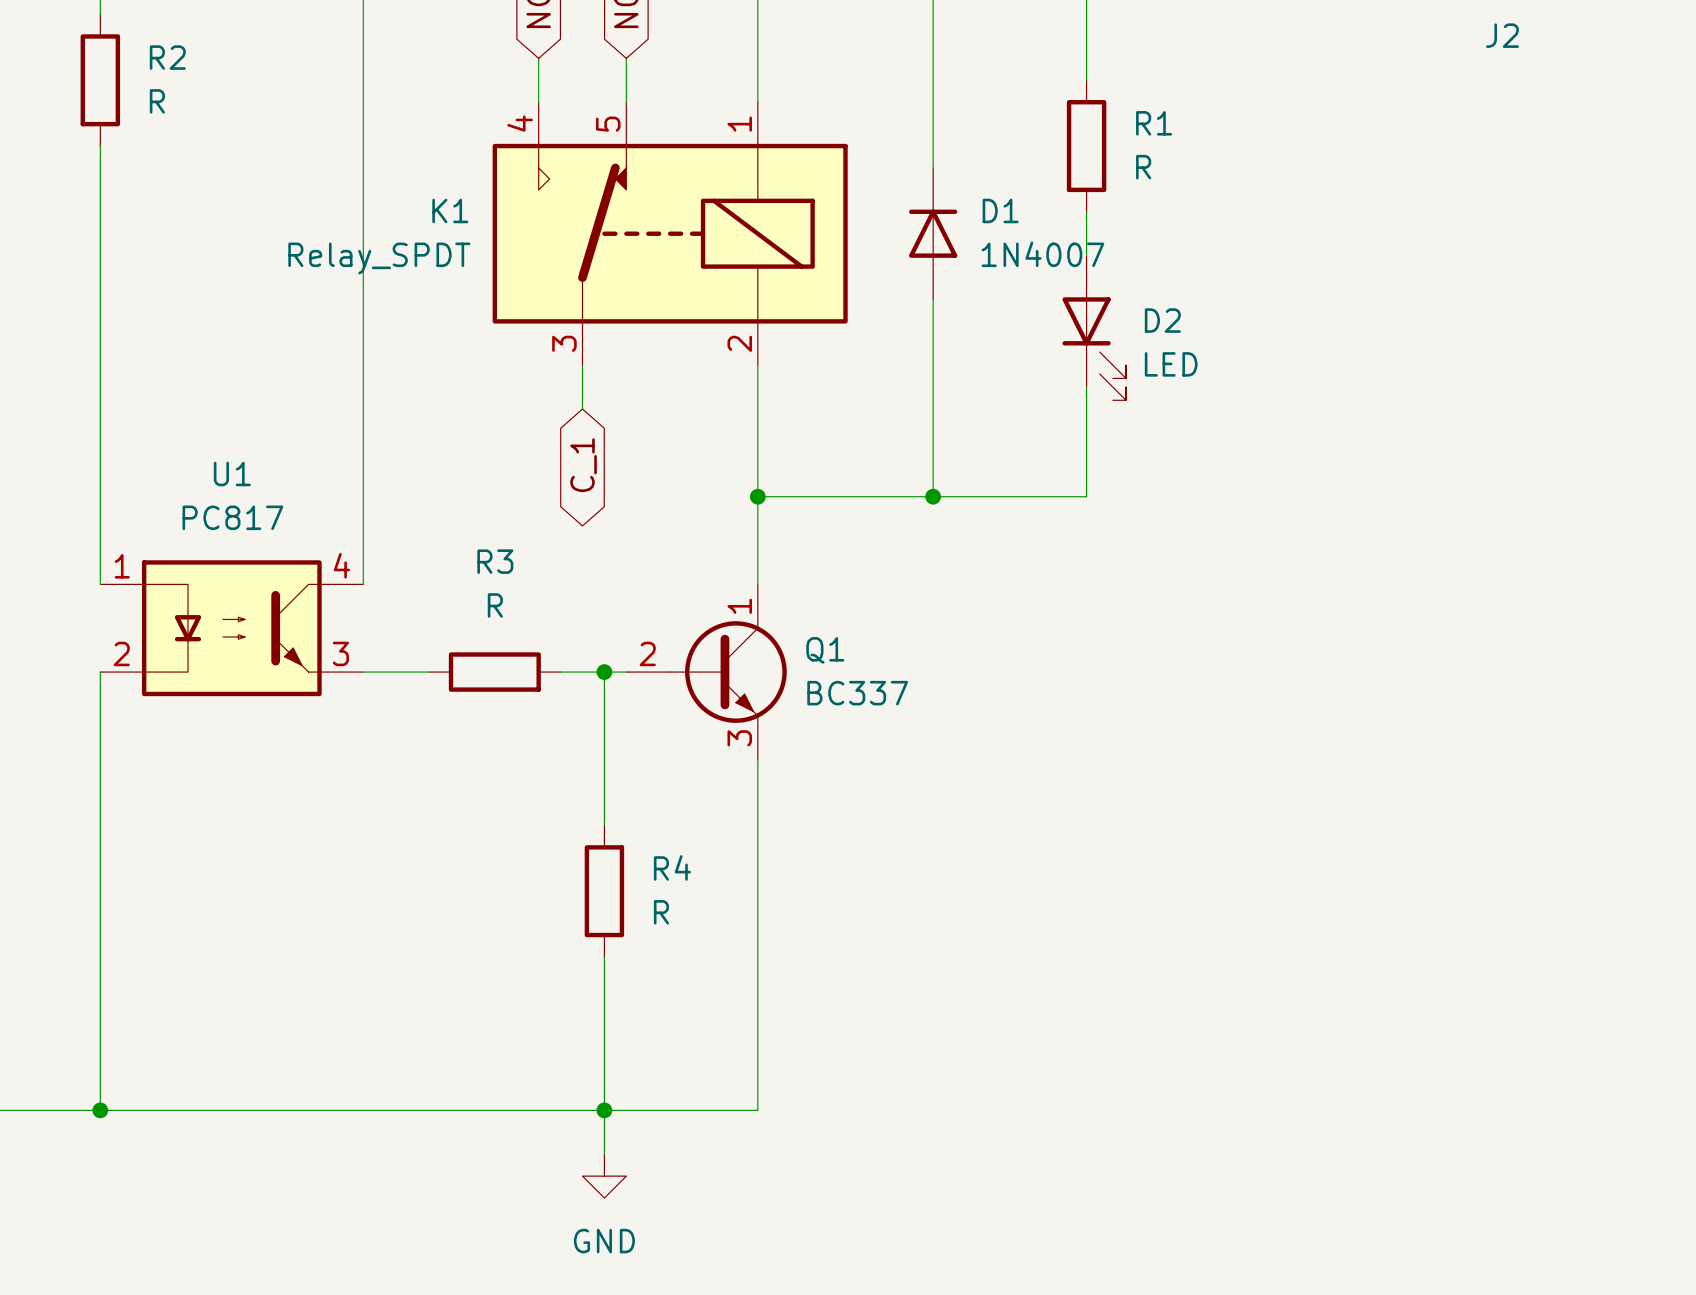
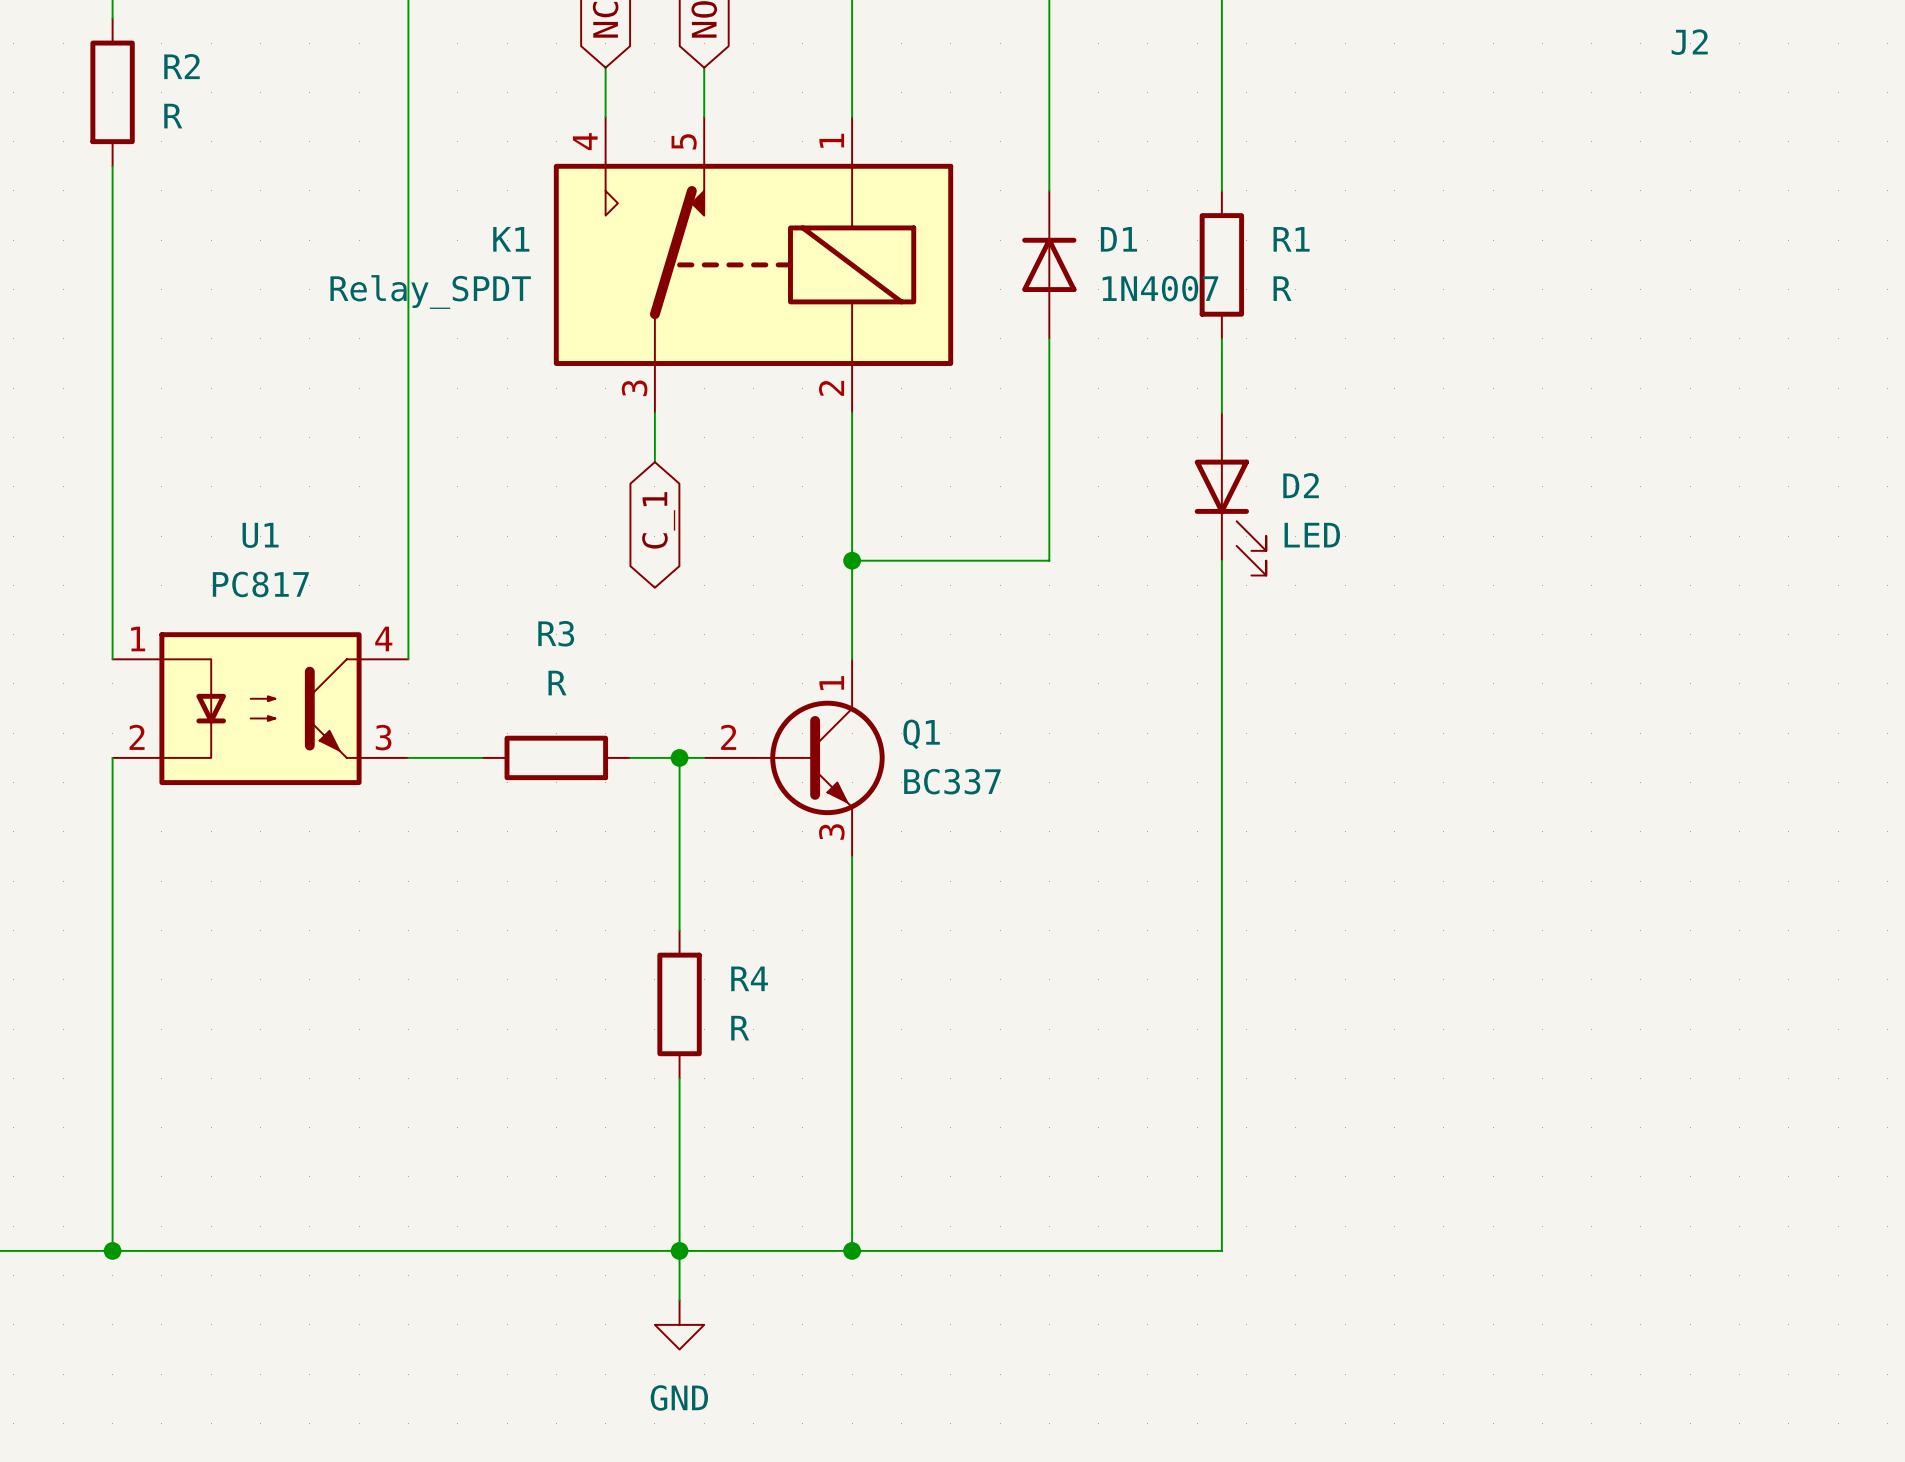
wire: none -> (1221, 92) (1221, 190)
R1 position: (1086, 146) -> (1221, 264)
wire: (1086, 211) (1086, 255) -> none
D2 position: (1094, 327) -> (1230, 494)
wire: (1086, 387) (1086, 496) (933, 496) -> none
junction: (933, 496) -> none
wire: none -> (1221, 560) (1221, 1250) (852, 1250)
junction: none -> (852, 1250)

